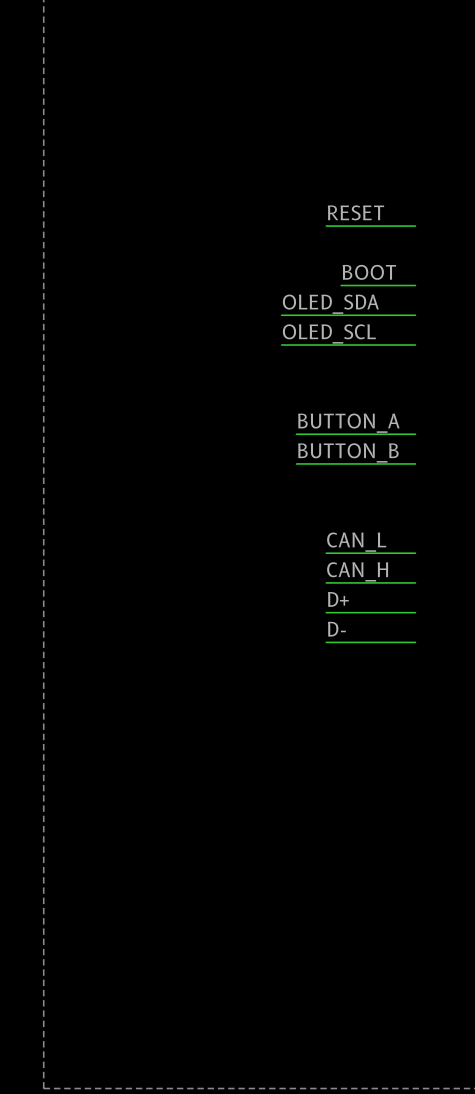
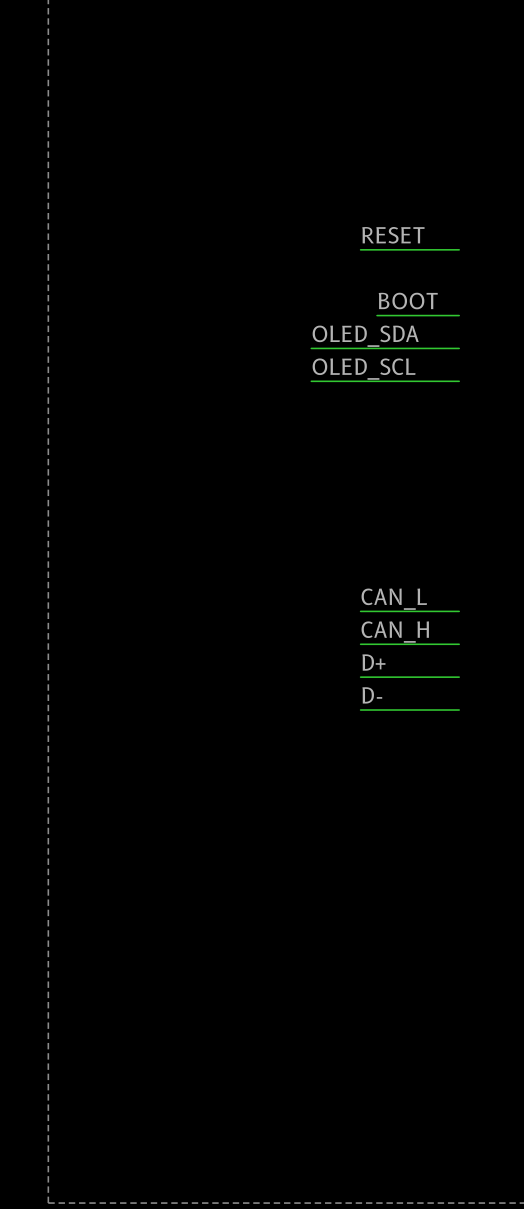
label: BUTTON_A (348, 423) -> none
wire: (296, 434) (415, 434) -> none
label: BUTTON_B (348, 452) -> none
wire: (296, 463) (415, 463) -> none

